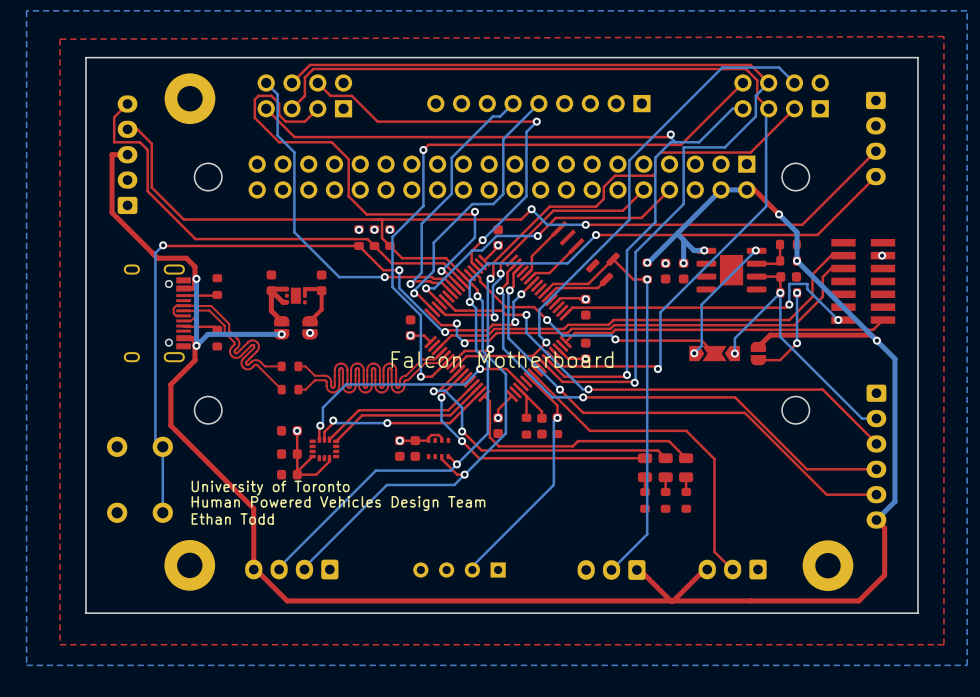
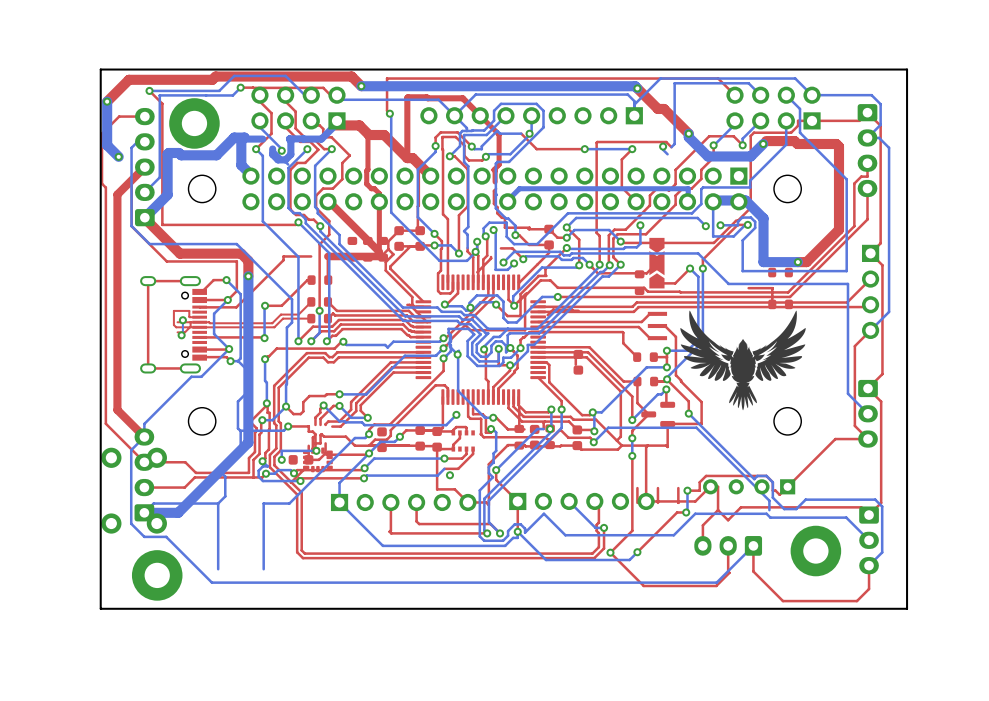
bottom zone outline: (967, 10) (26, 10) (26, 665) (967, 665) (967, 10) -> none
top zone outline: (943, 36) (60, 39) (60, 644) (943, 644) (943, 36) -> none
board edge: (917, 57) (86, 57) (86, 613) (917, 613) (917, 57) -> (907, 69) (907, 608) (100, 608) (100, 69) (907, 69)
top track: none -> (361, 86) (351, 76) (215, 76) (212, 79) (128, 79) (107, 101)
bottom track: none -> (361, 86) (635, 86) (637, 88)
via: none -> (361, 86)
top track: none -> (240, 87) (323, 87) (335, 99)
bottom track: none -> (240, 87) (232, 95) (206, 95)
via: none -> (240, 87)
top track: none -> (637, 88) (657, 108) (664, 108) (688, 133)
via: none -> (637, 88)
top track: none -> (149, 90) (162, 103) (162, 224) (295, 224) (298, 222)
bottom track: none -> (149, 90) (219, 90) (234, 75) (285, 75) (309, 99)
via: none -> (149, 90)
bottom track: (266, 82) (277, 94) (277, 135) -> none
top track: (317, 82) (330, 95) (351, 95) (377, 121) (536, 121) -> none
top track: (742, 82) (681, 144) (428, 144) (423, 149) -> (734, 95) (718, 78) (387, 78) (387, 110) (389, 113)
top track: (768, 82) (750, 64) (310, 64) (292, 82) -> none
bottom track: (768, 82) (755, 95) (755, 116) (724, 147) (683, 147) (683, 204) (635, 252) (634, 382) -> (760, 95) (748, 83) (674, 83) (674, 144) (671, 147)
bottom track: (794, 82) (779, 67) (722, 67) (629, 160) (629, 219) (539, 309) (539, 335) (546, 342) -> (786, 95) (800, 108) (800, 132) (846, 179) (846, 271) (742, 271) (742, 240) (755, 227) (755, 221) (750, 217) (742, 217) (737, 221) (737, 225) (720, 225)
bottom track: none -> (159, 95) (159, 177) (144, 192)
bottom track: none -> (206, 95) (159, 95)
top track: none -> (258, 99) (271, 113) (271, 133) (256, 149)
bottom track: none -> (335, 99) (438, 99) (466, 128) (466, 130)
bottom track: none -> (107, 101) (107, 145) (118, 156)
via: none -> (107, 101)
bottom track: none -> (634, 104) (660, 78) (795, 78) (811, 95) (871, 95) (880, 104) (880, 124) (867, 137) (879, 137) (889, 147) (889, 311) (870, 330)
part position: (189, 98) -> (194, 123)
bottom track: none -> (389, 113) (391, 212) (439, 260) (467, 260) (477, 250) (477, 241)
via: none -> (389, 113)
top track: (127, 103) (114, 117) (114, 142) (139, 142) (147, 149) (147, 191) (195, 239) (367, 239) (391, 263) (444, 263) (469, 289) (469, 302) -> none
bottom track: (538, 103) (503, 139) (503, 194) (493, 204) (472, 204) (433, 242) (433, 271) (414, 290) (414, 293) -> (531, 115) (531, 132) (510, 154) (488, 154) (485, 156)
bottom track: none -> (634, 115) (634, 101) (627, 94) (475, 94) (454, 115)
top track: none -> (144, 116) (119, 116) (101, 133) (101, 183) (105, 187) (105, 423) (144, 462) (185, 462) (195, 472) (248, 472) (248, 458) (254, 452) (254, 432) (256, 430) (250, 421) (266, 403) (267, 412) (269, 412) (268, 449) (262, 461)
top track: (266, 108) (294, 137) (330, 137) -> (283, 99) (295, 111) (295, 128) (304, 137) (312, 137) (324, 149)
top track: (317, 108) (304, 121) (285, 121) (279, 114) (279, 103) (271, 95) (258, 95) (254, 99) (254, 117) (279, 142) (331, 142) (348, 159) (348, 196) (366, 214) (472, 214) (474, 211) -> none
bottom track: (742, 108) (732, 108) (699, 142) (670, 142) (655, 157) (655, 222) (626, 250) (626, 375) -> (734, 120) (734, 124) (713, 145)
top track: (768, 108) (757, 97) (757, 80) (745, 69) (313, 69) (304, 77) (304, 95) (292, 108) -> none
bottom track: (768, 108) (766, 111) (766, 206) (660, 312) (660, 366) (657, 369) -> (760, 120) (742, 138) (742, 145)
top track: (794, 108) (774, 128) -> (797, 262) (806, 262) (839, 229) (839, 146) (836, 144) (797, 144) (794, 141) (766, 141)
bottom track: none -> (786, 120) (786, 144) (750, 180) (750, 187) (703, 187) (701, 189) (701, 204) (692, 213) (567, 213) (537, 244) (514, 244) (506, 236) (506, 222) (489, 222) (483, 228) (485, 236)
bottom track: none -> (258, 125) (281, 150)
top track: none -> (283, 125) (300, 141) (310, 141) (318, 149) (305, 162) (297, 162) (290, 169) (290, 209) (296, 214) (304, 214) (308, 219) (313, 219) (320, 226)
top track: none -> (309, 125) (319, 125) (323, 128) (323, 137) (331, 137) (349, 155) (342, 163) (342, 179) (332, 188) (323, 188) (316, 195) (316, 207) (329, 221) (329, 234) (319, 244) (319, 310)
top track: none -> (335, 125) (359, 125) (369, 135) (384, 135) (407, 158)
bottom track: none -> (335, 125) (321, 139) (289, 138) (290, 154) (285, 159) (278, 159) (272, 154) (272, 148)
bottom track: (500, 116) (492, 116) (451, 157) (451, 193) (421, 223) (421, 272) (410, 283) -> (493, 128) (486, 135) (464, 135) (464, 162) (468, 166) (468, 226) (464, 231) (467, 234) (467, 248)
bottom track: none -> (521, 133) (499, 133) (497, 130) (481, 146) (481, 149) (474, 149) (471, 146)
bottom track: (536, 121) (526, 131) (526, 196) (482, 240) -> none
bottom track: none -> (688, 133) (688, 137) (707, 156) (750, 156) (763, 144)
via: none -> (688, 133)
top track: none -> (369, 136) (366, 184) (379, 193) (379, 254) (379, 251) (327, 200)
bottom track: none -> (234, 137) (244, 137) (241, 140) (241, 165) (250, 174)
bottom track: none -> (234, 137) (216, 155) (181, 155) (178, 152) (168, 152) (167, 194) (144, 217)
bottom track: none -> (234, 137) (262, 139)
top track: (127, 129) (137, 129) (151, 143) (151, 187) (183, 219) (521, 219) (531, 209) -> none
bottom track: none -> (144, 141) (137, 141) (131, 147) (131, 225) (149, 244) (236, 244) (292, 299) (292, 322) (286, 327) (286, 406) (272, 420) (262, 420)
top track: (771, 131) (750, 152) (660, 152) (655, 157) (655, 173) (653, 175) (615, 175) (603, 187) (603, 198) (596, 206) (549, 206) (493, 262) (493, 275) (490, 278) -> none
via: none -> (763, 144)
top track: none -> (713, 145) (713, 157) (701, 169) (701, 178) (691, 188) (682, 188) (675, 195) (675, 204) (646, 234) (617, 234) (613, 238) (613, 257) (620, 264)
via: none -> (713, 145)
via: none -> (742, 145)
top track: none -> (435, 146) (435, 137) (440, 132) (457, 132) (471, 146)
bottom track: none -> (435, 146) (435, 151) (417, 169) (417, 217) (434, 233)
via: none -> (435, 146)
via: none -> (471, 146)
top track: (670, 134) (668, 137) (592, 137) -> none
top track: none -> (671, 147) (666, 142) (596, 142) (596, 232) (599, 235) (599, 264)
bottom track: none -> (256, 149) (262, 155) (262, 221) (298, 256) (298, 341)
via: none -> (256, 149)
bottom track: none -> (307, 149) (288, 168) (288, 208) (293, 213) (299, 213) (305, 219) (305, 223) (403, 320) (457, 320) (460, 324) (470, 324) (480, 334) (472, 342) (472, 354) (479, 361) (497, 361) (498, 348)
via: none -> (307, 149)
via: none -> (331, 149)
top track: (544, 137) (338, 137) -> (536, 149) (521, 133)
via: none -> (584, 149)
bottom track: none -> (632, 149) (584, 149)
via: none -> (632, 149)
via: none -> (281, 150)
via: none -> (118, 156)
top track: none -> (449, 156) (454, 156) (467, 169) (467, 206) (458, 215) (458, 253)
bottom track: none -> (449, 156) (460, 146) (460, 133) (462, 130) (484, 130) (494, 120) (494, 110) (501, 103) (536, 103) (543, 110) (543, 127) (509, 161) (497, 161) (495, 163) (495, 208) (515, 225) (515, 235)
via: none -> (449, 156)
top track: none -> (485, 156) (482, 160) (468, 160) (464, 155) (464, 145) (455, 137) (442, 137) (443, 214) (447, 219) (447, 282)
via: none -> (485, 156)
top track: none -> (407, 158) (407, 97) (462, 98) (499, 134) (499, 164) (493, 169) (495, 181)
top track: none -> (407, 158) (412, 158) (430, 176)
bottom track: (423, 149) (423, 206) (392, 236) (392, 287) (420, 315) (420, 376) -> none
via: (423, 149) -> none
top track: (875, 151) (802, 224) (585, 224) -> (867, 163) (867, 176) (861, 176) (854, 183) (854, 226) (788, 292) (680, 292) (647, 291) (644, 287) (557, 287) (550, 280) (540, 280) (525, 296) (525, 330) (470, 330) (465, 325)
bottom track: (294, 152) (294, 232) (339, 277) (384, 277) -> none
top track: (127, 154) (112, 154) (112, 212) (157, 258) (186, 258) (194, 266) (194, 288) (183, 288) -> none
part position: (127, 154) -> (144, 167)
top track: none -> (418, 167) (417, 228) (420, 230) (399, 230) (388, 241) (388, 249)
top track: none -> (496, 188) (493, 190) (493, 203) (497, 207) (497, 213) (501, 217) (504, 217) (504, 227) (549, 229) (557, 237) (566, 237)
top track: (875, 176) (817, 235) (596, 235) -> (867, 188) (867, 219) (790, 296) (557, 296)
bottom track: none -> (687, 200) (688, 188) (519, 188) (507, 200)
top track: (643, 189) (622, 210) (553, 210) (500, 263) (500, 273) -> (636, 201) (621, 187) (621, 159) (632, 149)
top track: (669, 189) (641, 217) (633, 217) -> (742, 145) (733, 136) (709, 136) (675, 169) (675, 184) (668, 190) (666, 188) (656, 188) (649, 195) (649, 205) (625, 229)
top track: (746, 189) (754, 189) (779, 214) -> none
bottom track: (746, 189) (721, 189) (647, 262) -> none
top track: none -> (144, 217) (180, 253) (241, 253) (248, 260) (248, 276)
bottom track: (531, 209) (547, 224) (585, 224) -> none
via: (531, 209) -> none
bottom track: none -> (298, 222) (329, 253) (329, 338) (326, 341)
via: none -> (298, 222)
bottom track: (474, 211) (474, 237) (441, 271) -> none
via: (474, 211) -> none
bottom track: none -> (640, 225) (640, 243) (636, 247) (566, 248)
via: none -> (640, 225)
via: none -> (720, 225)
top track: none -> (747, 224) (737, 224) (702, 259) (702, 268)
bottom track: none -> (747, 224) (745, 224) (733, 236) (713, 236) (713, 200) (745, 200) (763, 218) (763, 262) (797, 262)
via: none -> (747, 224)
bottom track: none -> (320, 226) (320, 231) (405, 316) (459, 316) (462, 319) (472, 319) (488, 333) (476, 344) (476, 352) (481, 356) (487, 356) (491, 352) (491, 345) (495, 341) (501, 341) (506, 345) (506, 352) (510, 348) (507, 345) (507, 335) (509, 333) (539, 333) (600, 271) (609, 265)
via: none -> (320, 226)
bottom track: none -> (705, 226) (697, 217) (576, 217) (566, 227)
via: none -> (705, 226)
bottom track: (779, 214) (797, 232) (797, 260) (876, 340) -> none
via: (779, 214) -> none
via: none -> (566, 227)
top track: (622, 217) (555, 217) (537, 235) -> (614, 229) (608, 235) (609, 265)
bottom track: none -> (493, 230) (495, 232) (495, 269) (507, 269) (514, 263)
via: none -> (493, 230)
top track: none -> (569, 230) (579, 239) (579, 265)
top track: (382, 219) (382, 238) (402, 258) (445, 258) (477, 289) (477, 296) -> none
top track: none -> (434, 233) (441, 241) (438, 291) (440, 293) (450, 293) (452, 290) (452, 282)
via: none -> (434, 233)
top track: none -> (515, 235) (519, 235) (529, 244) (549, 244) (549, 252) (518, 282)
via: none -> (515, 235)
top track: none -> (485, 236) (487, 255) (483, 259) (483, 282)
via: none -> (485, 236)
via: (585, 224) -> none
part: none -> (549, 237)
bottom track: none -> (566, 237) (574, 230) (609, 230) (620, 241)
via: none -> (566, 237)
part: none -> (399, 238)
part: none -> (420, 238)
top track: (559, 228) (531, 256) (531, 269) (526, 275) -> none
via: (359, 229) -> none
via: (374, 229) -> none
via: (389, 229) -> none
top track: none -> (620, 241) (713, 242) (750, 207) (750, 135) (753, 132) (791, 132) (798, 125) (798, 120) (859, 120) (867, 112) (880, 125) (880, 243) (870, 253) (882, 265) (882, 374) (868, 388) (881, 401) (881, 502) (869, 515) (861, 507) (740, 507) (728, 520) (718, 510)
via: none -> (620, 241)
top track: none -> (477, 241) (478, 282)
via: none -> (477, 241)
top track: none -> (434, 245) (399, 246)
bottom track: none -> (434, 245) (450, 245) (458, 253)
via: none -> (434, 245)
bottom track: (677, 233) (693, 250) (704, 250) -> none
top track: none -> (410, 246) (390, 268) (423, 301)
bottom track: (537, 235) (496, 235) (482, 250) (472, 250) (434, 288) (426, 288) -> none
via: (537, 235) -> none
bottom track: (596, 235) (567, 263) (487, 263) (469, 281) (469, 302) -> (331, 149) (315, 165) (315, 206) (317, 213) (339, 235) (339, 244) (402, 307) (437, 307) (441, 311) (461, 311) (462, 313)
via: (596, 235) -> none
top track: none -> (467, 248) (467, 251) (473, 257) (473, 282)
top track: none -> (500, 248) (512, 248) (523, 259)
top track: none -> (566, 248) (545, 269) (546, 275) (538, 275) (520, 294) (520, 316) (507, 316) (496, 304)
via: none -> (566, 248)
top track: none -> (388, 249) (393, 254) (385, 262) (385, 270) (412, 297) (412, 304) (414, 306) (423, 306)
top track: none -> (388, 249) (381, 256) (327, 256) (328, 280)
part: (498, 237) -> none
part: (567, 237) -> none
top track: (482, 240) (471, 251) (471, 262) (477, 267) -> none
bottom track: (683, 240) (683, 263) -> none
via: none -> (458, 253)
top track: none -> (311, 256) (283, 256) (283, 260) (236, 307) (199, 307)
top track: (780, 244) (780, 260) (777, 263) (756, 263) -> none
part: (788, 244) -> none
top track: (163, 245) (359, 245) (383, 270) (399, 270) -> none
bottom track: (163, 245) (155, 253) (155, 439) (162, 446) (162, 512) -> none
via: (163, 245) -> none
via: (498, 245) -> none
top track: (576, 246) (549, 273) (535, 273) (529, 278) -> none
bottom track: none -> (523, 259) (526, 256) (558, 256) (561, 259) (582, 258) (589, 264)
via: none -> (523, 259)
bottom track: none -> (503, 262) (514, 251) (560, 251) (563, 255) (571, 253) (698, 253) (728, 283) (847, 283) (847, 393) (868, 413)
via: none -> (503, 262)
via: (704, 250) -> none
bottom track: (755, 250) (701, 304) (701, 345) (694, 353) -> none
via: (755, 250) -> none
via: none -> (514, 263)
top track: none -> (656, 263) (646, 273) (597, 273) (589, 264)
bottom track: none -> (579, 265) (576, 267) (542, 267) (513, 296) (513, 304)
via: none -> (579, 265)
via: none -> (589, 264)
via: none -> (599, 264)
via: none -> (609, 265)
bottom track: none -> (620, 264) (608, 276) (602, 276) (534, 344) (527, 344)
via: none -> (620, 264)
top track: (843, 255) (831, 255) (812, 274) (812, 296) (789, 320) (613, 320) (608, 324) (568, 324) (563, 328) (494, 328) (487, 335) (451, 335) (437, 349) -> none
via: (882, 255) -> none
top track: none -> (690, 268) (675, 283) (656, 283)
bottom track: none -> (690, 268) (698, 276) (698, 339) (687, 350) (666, 350)
via: none -> (690, 268)
bottom track: none -> (702, 268) (702, 341) (667, 379)
via: none -> (702, 268)
via position: (797, 260) -> (797, 262)
via: (647, 262) -> none
via: (665, 263) -> none
via: (683, 263) -> none
bottom track: none -> (248, 276) (248, 442) (178, 512) (144, 512) (153, 503) (218, 503)
via: none -> (248, 276)
top track: (515, 264) (507, 272) (507, 282) (499, 290) -> none
top track: (519, 267) (513, 273) (513, 286) (509, 290) -> none
top track: none -> (870, 279) (847, 302) (636, 302) (632, 306) (538, 306)
top track: none -> (226, 280) (213, 280) (199, 291)
bottom track: none -> (226, 280) (240, 294) (240, 358) (237, 361) (230, 361)
via: none -> (226, 280)
top track: none -> (311, 280) (307, 280) (281, 305) (265, 305)
part: none -> (319, 280)
top track: (843, 268) (831, 268) (822, 276) (822, 296) (794, 325) (614, 325) (610, 328) (571, 328) (567, 332) (496, 332) (489, 340) (467, 340) (464, 343) -> none
top track: none -> (190, 281) (148, 281) (148, 368) (190, 368)
part: (602, 269) -> none
bottom track: (399, 270) (399, 288) (445, 332) -> none
via: (399, 270) -> none
top track: none -> (488, 282) (488, 295) (445, 338) (443, 338)
top track: none -> (493, 282) (493, 297) (443, 348)
top track: none -> (508, 282) (508, 299) (513, 304)
part: (731, 270) -> none
top track: (441, 271) (444, 271) (459, 285) -> none
via: (441, 271) -> none
top track: (473, 271) (480, 277) (480, 281) (505, 307) (534, 307) (547, 320) -> none
part: (665, 271) -> none
part: (683, 271) -> none
bottom track: (500, 273) (500, 278) (492, 285) (492, 315) (494, 317) -> none
via: (500, 273) -> none
part: (788, 276) -> none
top track: (384, 277) (445, 278) (455, 289) -> none
via: (384, 277) -> none
bottom track: (196, 278) (196, 345) (207, 334) (281, 334) -> none
via: (196, 278) -> none
bottom track: (490, 278) (487, 281) (487, 346) (490, 349) -> none
via: (490, 278) -> none
top track: (606, 279) (597, 288) (556, 288) (547, 296) -> none
top track: (647, 279) (633, 279) (613, 259) (588, 283) (553, 283) (544, 292) -> none
bottom track: (647, 279) (647, 534) (611, 570) -> none
via: (647, 279) -> none
part: none -> (870, 291)
part: (863, 281) -> none
part: (271, 282) -> none
part: (321, 282) -> none
top track: (410, 283) (413, 281) (441, 282) (452, 292) -> (458, 282) (458, 293) (444, 304)
via: (410, 283) -> none
bottom track: none -> (557, 296) (542, 296) (516, 322) (507, 322) (503, 318) (503, 301) (497, 295) (476, 295) (469, 303)
via: none -> (557, 296)
part: (217, 286) -> none
top track: none -> (199, 300) (227, 300) (236, 291) (236, 261) (166, 261) (131, 226) (131, 180) (144, 167) (117, 194) (117, 410) (144, 437)
bottom track: none -> (227, 300) (214, 313) (214, 334) (229, 349) (201, 376) (191, 376) (144, 423) (144, 437) (131, 450) (131, 523) (144, 536) (166, 536) (211, 582) (716, 582) (753, 545)
via: none -> (227, 300)
top track: (426, 288) (441, 303) -> none
via: (426, 288) -> none
top track: (286, 289) (271, 290) -> none
top track: (271, 290) (283, 302) (286, 302) -> none
top track: (271, 290) (271, 310) (281, 321) -> none
part: none -> (319, 301)
top track: none -> (327, 301) (336, 310) (408, 310) (414, 316) (423, 316)
bottom track: (499, 290) (503, 294) (503, 348) (552, 397) (583, 397) -> none
via: (499, 290) -> none
bottom track: (509, 290) (508, 338) (559, 389) -> none
via: (509, 290) -> none
bottom track: none -> (444, 304) (446, 306) (461, 306) (466, 310) (472, 310) (480, 302) (493, 302) (496, 304)
via: none -> (444, 304)
via: (780, 292) -> none
bottom track: (797, 292) (797, 343) -> none
via: (797, 292) -> none
via: (414, 293) -> none
via: none -> (496, 304)
top track: none -> (870, 304) (868, 307) (638, 307) (633, 311) (538, 311)
top track: (217, 294) (183, 295) -> none
bottom track: none -> (265, 305) (264, 338)
via: none -> (265, 305)
bottom track: (521, 294) (513, 302) (513, 320) (515, 322) -> none
part: (295, 295) -> none
top track: (304, 295) (304, 289) (321, 290) (321, 309) (310, 321) -> none
bottom track: (477, 296) (482, 301) (482, 350) (505, 374) (505, 433) (454, 484) (386, 484) (304, 569) -> none
bottom track: none -> (319, 310) (319, 332) (311, 341)
via: none -> (319, 310)
via: (585, 299) -> none
drawing: none -> [680, 310, 806, 411]
top track: (444, 300) (455, 310) (501, 310) (505, 314) (526, 314) -> none
via: (469, 302) -> none
top track: none -> (657, 313) (649, 313) (641, 321) (538, 321)
bottom track: (471, 303) (476, 308) (476, 350) (487, 361) (487, 433) (450, 470) (375, 470) (279, 569) -> (464, 315) (474, 315) (487, 328) (537, 328) (599, 264)
top track: (789, 304) (786, 307) (572, 307) (565, 314) -> none
bottom track: (789, 304) (789, 283) (807, 283) (807, 289) (838, 320) -> none
via: (789, 304) -> none
top track: none -> (311, 318) (283, 318) (274, 327) (177, 327)
part: none -> (319, 318)
top track: none -> (327, 318) (333, 313) (335, 315) (407, 315) (413, 321) (423, 321)
top track: (437, 307) (445, 314) (492, 314) (494, 317) -> none
part: (585, 307) -> none
bottom track: none -> (182, 320) (181, 335)
via: none -> (182, 320)
top track: (194, 310) (209, 310) (224, 325) (224, 332) (234, 342) (230, 350) (232, 356) (239, 357) (251, 345) (253, 345) (254, 347) (242, 359) (242, 366) (248, 369) (256, 364) (281, 389) -> (188, 322) (272, 323) (280, 314) (298, 314) (311, 301)
part position: (157, 313) -> (173, 324)
top track: (430, 314) (441, 325) (456, 323) -> none
bottom track: (526, 314) (526, 332) (582, 389) (588, 389) -> none
via: (526, 314) -> none
part: none -> (657, 326)
top track: (182, 315) (176, 315) (173, 313) (173, 308) (176, 305) (211, 305) (229, 323) (229, 330) (238, 340) (239, 345) (235, 353) (250, 340) (258, 343) (258, 349) (246, 362) (246, 364) (255, 360) (264, 366) (281, 366) -> (176, 327) (173, 325) (173, 310) (189, 310) (189, 317) (199, 317)
top track: none -> (423, 327) (413, 327) (405, 320) (338, 320) (332, 326) (313, 326) (298, 341)
top track: none -> (538, 327) (638, 327) (649, 338) (657, 338)
via: (494, 317) -> none
bottom track: none -> (507, 328) (499, 336) (493, 336) (484, 346) (484, 349)
top track: none -> (870, 330) (854, 346) (854, 425) (868, 439) (835, 439) (779, 494) (772, 490) (772, 482) (766, 475) (706, 475) (699, 482) (699, 490) (687, 490)
top track: none -> (423, 332) (411, 331) (403, 324) (340, 324) (334, 331) (321, 331) (311, 341)
bottom track: (547, 320) (562, 335) (611, 335) (615, 339) -> none
via: (547, 320) -> none
via: (838, 320) -> none
top track: (883, 320) (873, 329) (615, 329) (612, 332) (574, 332) (565, 342) -> none
top track: (515, 322) (512, 324) (492, 324) (487, 330) (446, 330) (445, 332) -> none
via: (515, 322) -> none
via: none -> (181, 335)
via: (456, 323) -> none
top track: none -> (423, 337) (410, 337) (401, 329) (342, 329) (326, 341)
top track: (183, 326) (214, 326) (217, 329) -> none
top track: none -> (199, 337) (264, 338)
via: none -> (264, 338)
bottom track: none -> (443, 338) (440, 341) (393, 341) (387, 347) (385, 344) (346, 344) (343, 341)
via: none -> (443, 338)
part: (281, 327) -> none
part: (310, 327) -> none
part: (410, 327) -> none
part: none -> (480, 339)
part: (498, 328) -> none
via: none -> (298, 341)
via: none -> (311, 341)
via: none -> (326, 341)
top track: none -> (343, 341) (334, 348) (276, 348) (265, 359)
via: none -> (343, 341)
via: (310, 332) -> none
via: (445, 332) -> none
bottom track: none -> (527, 345) (527, 351) (513, 365) (510, 365)
via: (281, 334) -> none
top track: (410, 335) (424, 335) (430, 342) -> none
via: (410, 335) -> none
top track: none -> (538, 347) (589, 347) (623, 381) (637, 381) (637, 403) (648, 414) (632, 430) (632, 438)
bottom track: none -> (443, 348) (436, 355) (404, 355) (366, 394) (339, 394)
via: none -> (443, 348)
top track: none -> (510, 348) (517, 355) (517, 368) (498, 388) (498, 397)
via: none -> (510, 348)
top track: none -> (520, 348) (520, 340) (529, 332) (622, 332) (623, 343) (637, 357)
bottom track: none -> (520, 348) (511, 357) (503, 357) (503, 362) (499, 365) (477, 365) (467, 356) (467, 341) (474, 334) (468, 328) (448, 328) (450, 335) (448, 343) (450, 351) (443, 358)
via: none -> (520, 348)
top track: none -> (229, 349) (199, 349)
via: none -> (229, 349)
top track: none -> (498, 348) (498, 364) (510, 365) (510, 370) (493, 387) (493, 397)
via: none -> (498, 348)
top track: (183, 338) (191, 338) (194, 341) (194, 360) (170, 384) (170, 425) (253, 508) (253, 567) (287, 600) (858, 600) (884, 575) (884, 528) (876, 520) -> none
part: (217, 338) -> none
top track: none -> (484, 349) (485, 351) (488, 397)
via: none -> (484, 349)
bottom track: none -> (458, 350) (458, 391) (484, 417) (493, 417)
top track: (615, 339) (701, 340) (714, 353) -> none
via: (615, 339) -> none
via: none -> (666, 350)
top track: none -> (423, 352) (337, 352) (332, 357) (329, 357) (325, 353) (306, 353) (274, 385) (276, 448) (269, 454) (269, 467) (297, 494) (297, 552) (302, 558) (594, 558) (604, 548) (604, 527)
top track: none -> (538, 352) (588, 352) (632, 396) (632, 420)
top track: (876, 340) (871, 335) (770, 335) (758, 346) -> none
bottom track: (876, 340) (894, 358) (894, 501) (876, 520) -> none
via: (876, 340) -> none
top track: (546, 342) (532, 356) (466, 356) (455, 367) -> none
via: (546, 342) -> none
top track: (797, 343) (780, 360) (758, 360) -> none
via: (797, 343) -> none
via: (196, 345) -> none
part: none -> (645, 357)
top track: none -> (666, 357) (653, 357)
top track: none -> (199, 357) (226, 357) (230, 361)
top track: none -> (423, 357) (338, 357) (333, 362) (327, 362) (323, 357) (308, 357) (278, 387) (280, 450) (274, 456) (274, 465) (301, 492) (301, 550) (304, 553) (592, 553) (598, 547) (598, 533) (596, 530) (598, 505) (594, 501)
top track: none -> (538, 357) (586, 357) (620, 391) (620, 436) (616, 440)
top track: none -> (575, 357) (575, 364)
bottom track: none -> (265, 359) (266, 403)
via: none -> (265, 359)
top track: none -> (443, 358) (443, 370) (389, 424) (374, 424) (369, 429) (369, 434)
via: none -> (443, 358)
via: none -> (230, 361)
bottom track: none -> (238, 360) (248, 371) (248, 391) (237, 401) (237, 428) (240, 431) (240, 448) (221, 467) (221, 473) (225, 476) (225, 496) (218, 503)
top track: (490, 349) (488, 350) (464, 350) (452, 363) -> none
via: (490, 349) -> none
top track: (558, 349) (568, 358) (585, 358) -> none
top track: none -> (423, 362) (390, 362) (351, 402) (351, 409) (339, 421) (328, 421) (325, 424)
top track: none -> (538, 362) (546, 362) (549, 365) (549, 382) (582, 415) (590, 415) (592, 412)
top track: (441, 352) (434, 359) (422, 359) (401, 378) (398, 387) (396, 386) (396, 368) (391, 363) (386, 364) (383, 367) (383, 386) (381, 387) (379, 386) (379, 368) (375, 363) (370, 364) (367, 367) (367, 386) (365, 387) (363, 386) (363, 368) (359, 363) (354, 364) (351, 367) (351, 386) (349, 387) (347, 386) (347, 368) (343, 364) (339, 363) (335, 367) (334, 386) (333, 387) (328, 376) (314, 375) (305, 366) (298, 366) -> none
via: none -> (510, 365)
via: (694, 353) -> none
part rotation: 0° (714, 353) -> 90° clockwise (656, 263)
part position: (714, 353) -> (656, 263)
bottom track: (734, 353) (734, 338) (780, 292) (780, 336) (862, 418) (876, 418) -> none
via: (734, 353) -> none
part: (758, 353) -> none
top track: none -> (423, 367) (392, 367) (356, 403) (356, 411) (340, 426) (332, 426)
top track: (444, 356) (438, 363) (425, 363) (407, 380) (404, 380) (403, 388) (399, 392) (394, 391) (391, 388) (391, 369) (389, 368) (388, 369) (387, 387) (383, 392) (378, 391) (375, 388) (375, 369) (373, 368) (371, 369) (371, 387) (366, 392) (362, 391) (359, 388) (359, 369) (357, 368) (355, 369) (355, 387) (351, 392) (346, 391) (343, 388) (342, 369) (341, 368) (339, 369) (339, 387) (335, 391) (328, 390) (325, 380) (314, 380) (305, 389) (298, 389) -> none
top track: (551, 356) (561, 366) (655, 366) (657, 369) -> none
bottom track: none -> (666, 367) (646, 367) (601, 412) (592, 412) (594, 431)
via: none -> (666, 367)
via: (585, 358) -> none
text: Falcon Motherboard (502, 359) -> none
top track: (448, 360) (431, 376) (420, 376) -> none
top track: (547, 360) (564, 376) (625, 376) (626, 375) -> none
top track: none -> (423, 372) (393, 372) (360, 405) (360, 410) (367, 417)
top track: (544, 363) (562, 381) (634, 382) -> none
part: (290, 366) -> none
top track: none -> (538, 377) (561, 401) (561, 409)
via: none -> (667, 379)
top track: (480, 369) (506, 369) (522, 385) -> none
bottom track: (480, 369) (464, 384) (346, 384) (322, 407) (322, 423) (320, 425) -> none
via: (480, 369) -> none
via: (657, 369) -> none
top track: (459, 370) (438, 391) (433, 391) -> none
part: none -> (645, 381)
top track: none -> (654, 381) (668, 381) (688, 401) (688, 413)
top track: (462, 374) (441, 397) -> none
top track: (533, 374) (589, 430) (686, 430) (714, 459) (714, 551) (732, 569) -> none
via: (626, 375) -> none
via: (420, 376) -> none
top track: (529, 377) (557, 405) (557, 417) -> none
top track: none -> (666, 389) (667, 404)
bottom track: none -> (666, 389) (661, 394) (657, 394) (632, 420)
via: none -> (666, 389)
via: (634, 382) -> none
top track: none -> (339, 394) (309, 396) (303, 402) (303, 411) (300, 414) (293, 414) (286, 406)
via: none -> (339, 394)
top track: none -> (442, 397) (442, 427) (440, 430) (406, 430) (399, 436)
top track: none -> (447, 397) (447, 388) (444, 385) (435, 385) (390, 430) (390, 435) (386, 439) (375, 439) (369, 445)
top track: (473, 385) (448, 410) (358, 410) (329, 439) -> none
top track: none -> (468, 397) (468, 416) (470, 418) (481, 419) (480, 434) (483, 437) (545, 437) (550, 439) (560, 429) (568, 437) (590, 437) (593, 442)
top track: none -> (508, 397) (508, 408) (522, 421) (568, 421) (577, 429) (594, 431)
top track: none -> (513, 397) (513, 406) (523, 416) (570, 416) (573, 419) (595, 419) (621, 445)
top track: none -> (518, 397) (518, 405) (525, 412) (548, 412) (551, 409)
top track: (477, 388) (450, 415) (362, 415) (336, 441) -> none
top track: (519, 388) (541, 411) (541, 418) -> none
part: (290, 389) -> none
top track: (559, 389) (583, 412) (675, 412) -> (621, 445) (667, 446) (667, 424)
via: (559, 389) -> none
top track: (588, 389) (822, 389) (876, 443) -> none
via: (588, 389) -> none
bottom track: (433, 391) (445, 390) (462, 407) (462, 431) -> none
via: (433, 391) -> none
via: none -> (266, 403)
top track: (480, 392) (449, 423) (387, 423) -> none
top track: none -> (323, 405) (315, 417) (315, 424)
bottom track: none -> (323, 405) (339, 421) (361, 422) (364, 425) (446, 425) (456, 414)
via: none -> (323, 405)
top track: none -> (339, 405) (333, 405) (320, 418) (320, 424)
bottom track: none -> (339, 405) (351, 417) (367, 417)
via: none -> (339, 405)
via: none -> (286, 406)
top track: (484, 395) (489, 401) (489, 437) (498, 446) (572, 446) (578, 441) (669, 441) (686, 458) -> none
top track: (511, 395) (498, 409) (498, 417) -> none
top track: none -> (473, 408) (473, 414) (482, 414) (485, 417) (485, 432) (490, 432) (493, 429)
bottom track: (441, 397) (441, 420) (462, 441) -> none
via: (441, 397) -> none
top track: (583, 397) (735, 397) (807, 469) (876, 469) -> none
via: (583, 397) -> none
bottom track: none -> (551, 409) (551, 431) (484, 498) (484, 530) (487, 533)
via: none -> (551, 409)
bottom track: none -> (561, 409) (561, 427) (488, 500) (488, 522) (500, 533)
via: none -> (561, 409)
via: none -> (592, 412)
bottom track: none -> (688, 413) (754, 479) (757, 475) (766, 475) (772, 482) (772, 497) (784, 509) (796, 509) (805, 499) (875, 499) (882, 506) (882, 552) (869, 565)
via: none -> (688, 413)
part: none -> (868, 413)
via: none -> (456, 414)
part: none -> (658, 414)
via: none -> (367, 417)
top track: none -> (493, 417) (496, 417) (507, 429) (524, 429)
via: none -> (493, 417)
via: none -> (632, 420)
top track: none -> (262, 420) (259, 434) (259, 453) (253, 459) (253, 477)
via: none -> (262, 420)
top track: none -> (544, 421) (543, 429)
top track: (709, 412) (744, 412) (826, 494) (876, 494) -> (701, 423) (701, 402) (675, 375) (675, 336) (665, 326) (657, 326)
bottom track: none -> (288, 426) (283, 430) (240, 430)
via: none -> (288, 426)
top track: none -> (308, 426) (288, 426)
top track: none -> (308, 426) (308, 431) (315, 434) (316, 450)
bottom track: none -> (543, 429) (537, 429) (496, 470)
bottom track: (557, 417) (553, 421) (553, 484) (472, 566) (472, 570) -> none
bottom track: none -> (493, 429) (496, 432) (496, 450) (493, 453) (493, 462) (488, 467) (488, 473) (492, 477) (479, 490) (479, 536) (484, 540) (503, 540) (508, 535) (508, 531) (514, 524) (520, 524) (525, 528) (525, 532) (543, 513) (565, 535) (673, 535) (695, 513) (766, 513) (770, 517) (846, 517) (869, 540)
top track: (333, 420) (333, 423) (324, 431) (324, 439) -> none
bottom track: (333, 420) (335, 423) (387, 423) -> none
via: (333, 420) -> none
top track: none -> (437, 431) (453, 432) (456, 427) (465, 427) (466, 432)
via: none -> (594, 431)
top track: none -> (459, 432) (459, 438) (453, 444) (453, 449) (439, 449) (436, 446) (354, 445) (345, 436) (324, 436) (321, 434) (320, 443) (315, 443)
bottom track: none -> (369, 434) (365, 438) (354, 438) (289, 503) (263, 503) (263, 569)
via: none -> (369, 434)
via: (387, 423) -> none
via: (320, 425) -> none
bottom track: none -> (399, 436) (394, 441) (380, 441) (339, 482) (339, 502) (382, 545) (505, 545) (513, 537) (517, 537) (517, 531) (546, 560) (629, 560) (637, 552)
via: none -> (399, 436)
part: (498, 425) -> none
part: none -> (577, 437)
part: none -> (420, 438)
bottom track: none -> (632, 438) (632, 456)
via: none -> (632, 438)
part: none -> (382, 439)
part: none -> (437, 439)
part: (289, 430) -> none
top track: (297, 430) (297, 474) (316, 474) (329, 461) (329, 458) -> none
via: (297, 430) -> none
top track: (462, 431) (481, 450) (657, 450) (665, 458) -> none
via: (462, 431) -> none
bottom track: none -> (593, 442) (608, 427) (696, 427) (769, 500) (769, 510)
via: none -> (593, 442)
top track: none -> (325, 443) (325, 453) (319, 459) (308, 459) (308, 445)
top track: none -> (621, 445) (617, 449) (581, 449) (577, 445) (507, 445) (488, 464) (488, 505) (486, 502) (467, 502) (454, 489) (437, 489) (437, 447)
top track: none -> (647, 445) (646, 501) (695, 501) (710, 486) (718, 486) (718, 510)
top track: none -> (466, 449) (466, 454) (462, 458) (444, 458)
top track: none -> (473, 449) (473, 453) (458, 468) (444, 468)
bottom track: none -> (316, 450) (281, 450) (281, 459)
via: none -> (316, 450)
via: (399, 440) -> none
top track: (415, 440) (399, 440) -> none
top track: (441, 440) (438, 435) (431, 435) (428, 440) (415, 440) -> none
top track: (462, 441) (479, 458) (645, 458) -> none
via: (462, 441) -> none
top track: none -> (369, 453) (325, 453)
via: none -> (369, 453)
top track: none -> (632, 456) (632, 530) (610, 552) (643, 585) (716, 585) (729, 572) (728, 545)
via: none -> (632, 456)
bottom track: none -> (444, 458) (374, 458) (364, 468)
via: none -> (444, 458)
via: none -> (281, 459)
part: none -> (301, 459)
part: (399, 448) -> none
part: (415, 448) -> none
part position: (438, 448) -> (463, 440)
bottom track: none -> (262, 461) (267, 466) (262, 466) (258, 470) (258, 476) (262, 481) (300, 481)
via: none -> (262, 461)
part: (289, 454) -> none
top track: (441, 456) (441, 459) (457, 474) (464, 474) -> none
top track: (448, 456) (456, 464) -> none
part: (876, 456) -> none
top track: none -> (364, 468) (362, 470) (297, 470) (293, 473)
via: none -> (364, 468)
bottom track: none -> (444, 468) (437, 475) (366, 475) (364, 478)
top track: none -> (496, 470) (496, 479) (517, 501) (517, 531)
via: none -> (496, 470)
top track: none -> (266, 473) (262, 477) (194, 477) (184, 487) (144, 487)
via: none -> (266, 473)
bottom track: none -> (293, 473) (290, 470) (278, 470) (274, 473) (266, 473)
via: none -> (293, 473)
top track: none -> (364, 478) (299, 478) (297, 480) (300, 481)
via: none -> (364, 478)
part: (645, 467) -> none
part: (665, 467) -> none
part: (686, 467) -> none
via: none -> (300, 481)
part: (289, 474) -> none
via: (464, 474) -> none
part: none -> (749, 486)
bottom track: none -> (687, 490) (686, 512)
via: none -> (687, 490)
text: University of Toronto (270, 488) -> none
bottom track: none -> (569, 501) (595, 527) (604, 527)
part: none -> (581, 501)
top track: none -> (390, 502) (389, 531) (391, 533) (487, 533)
part: none -> (403, 502)
top track: none -> (416, 502) (416, 521) (419, 524) (490, 524) (500, 533)
bottom track: none -> (218, 503) (218, 569)
top track: none -> (718, 510) (702, 525) (702, 545)
part: (645, 500) -> none
part: (665, 500) -> none
part: (686, 500) -> none
top track: none -> (686, 512) (677, 512) (637, 552)
via: none -> (686, 512)
text: Human Powered Vehicles Design Team (338, 503) -> none
via: none -> (604, 527)
text: Ethan Todd (232, 519) -> none
via: none -> (517, 531)
via: none -> (487, 533)
via: none -> (500, 533)
part: none -> (869, 540)
top track: none -> (753, 545) (753, 571) (782, 601) (856, 601) (869, 589) (869, 565)
via: none -> (637, 552)
via: none -> (610, 552)
part position: (189, 565) -> (157, 575)
part position: (827, 565) -> (815, 551)
part rotation: 0° (291, 569) -> 90° clockwise (144, 474)
part position: (291, 569) -> (144, 474)
top track: (707, 569) (704, 569) (673, 600) -> none
part position: (732, 569) -> (728, 545)
part: (459, 570) -> none
part: (611, 570) -> none
top track: (636, 570) (639, 570) (670, 600) -> none

